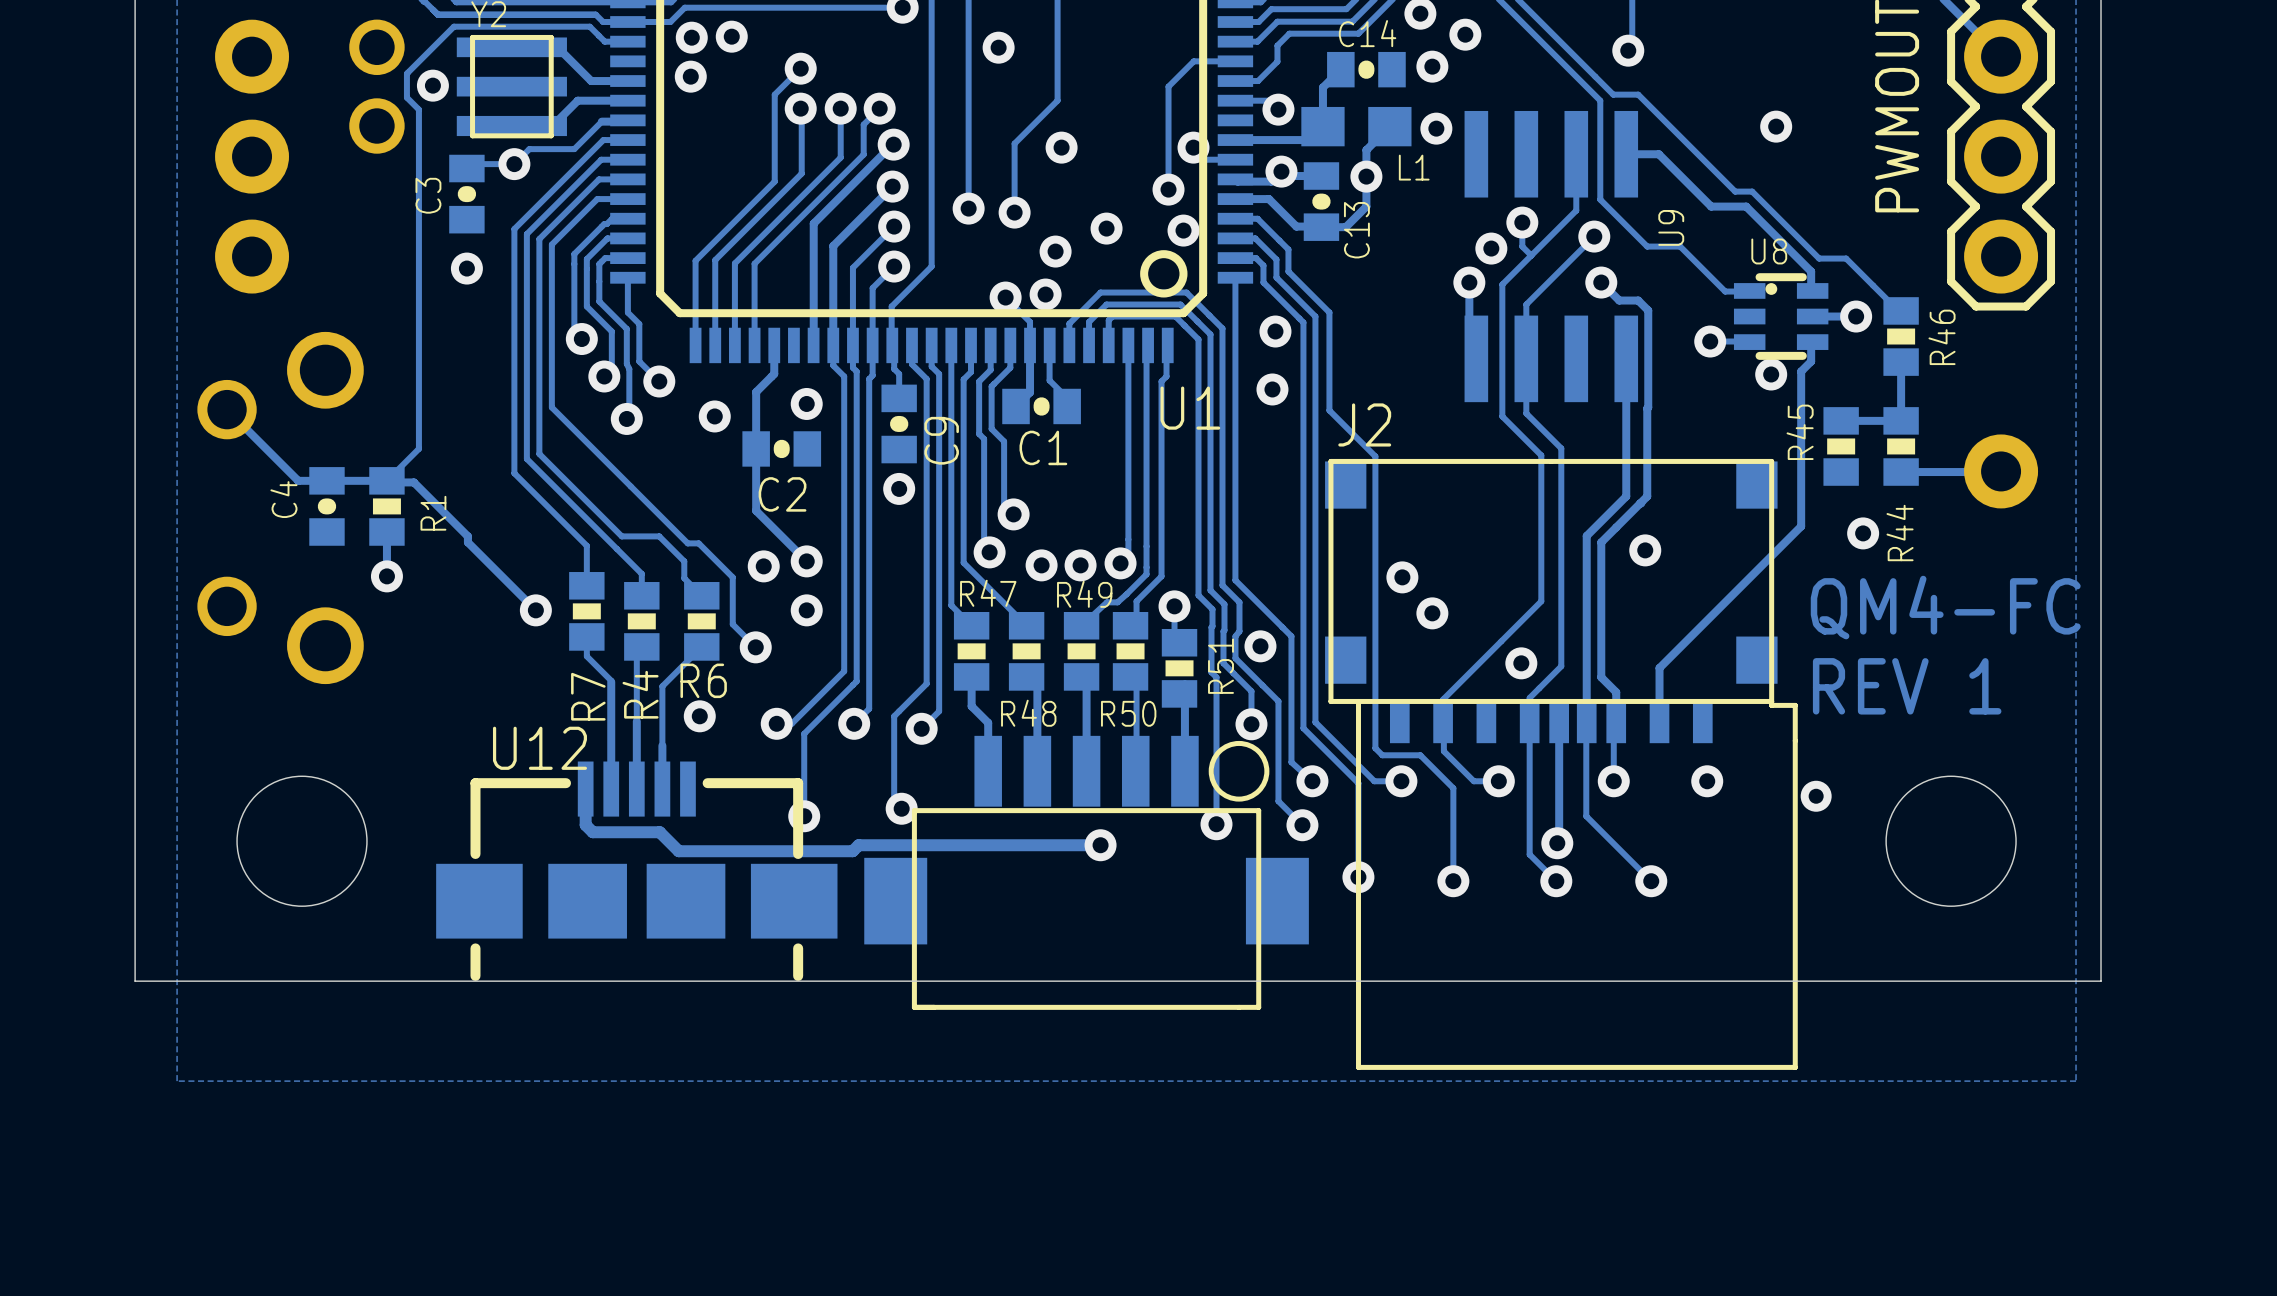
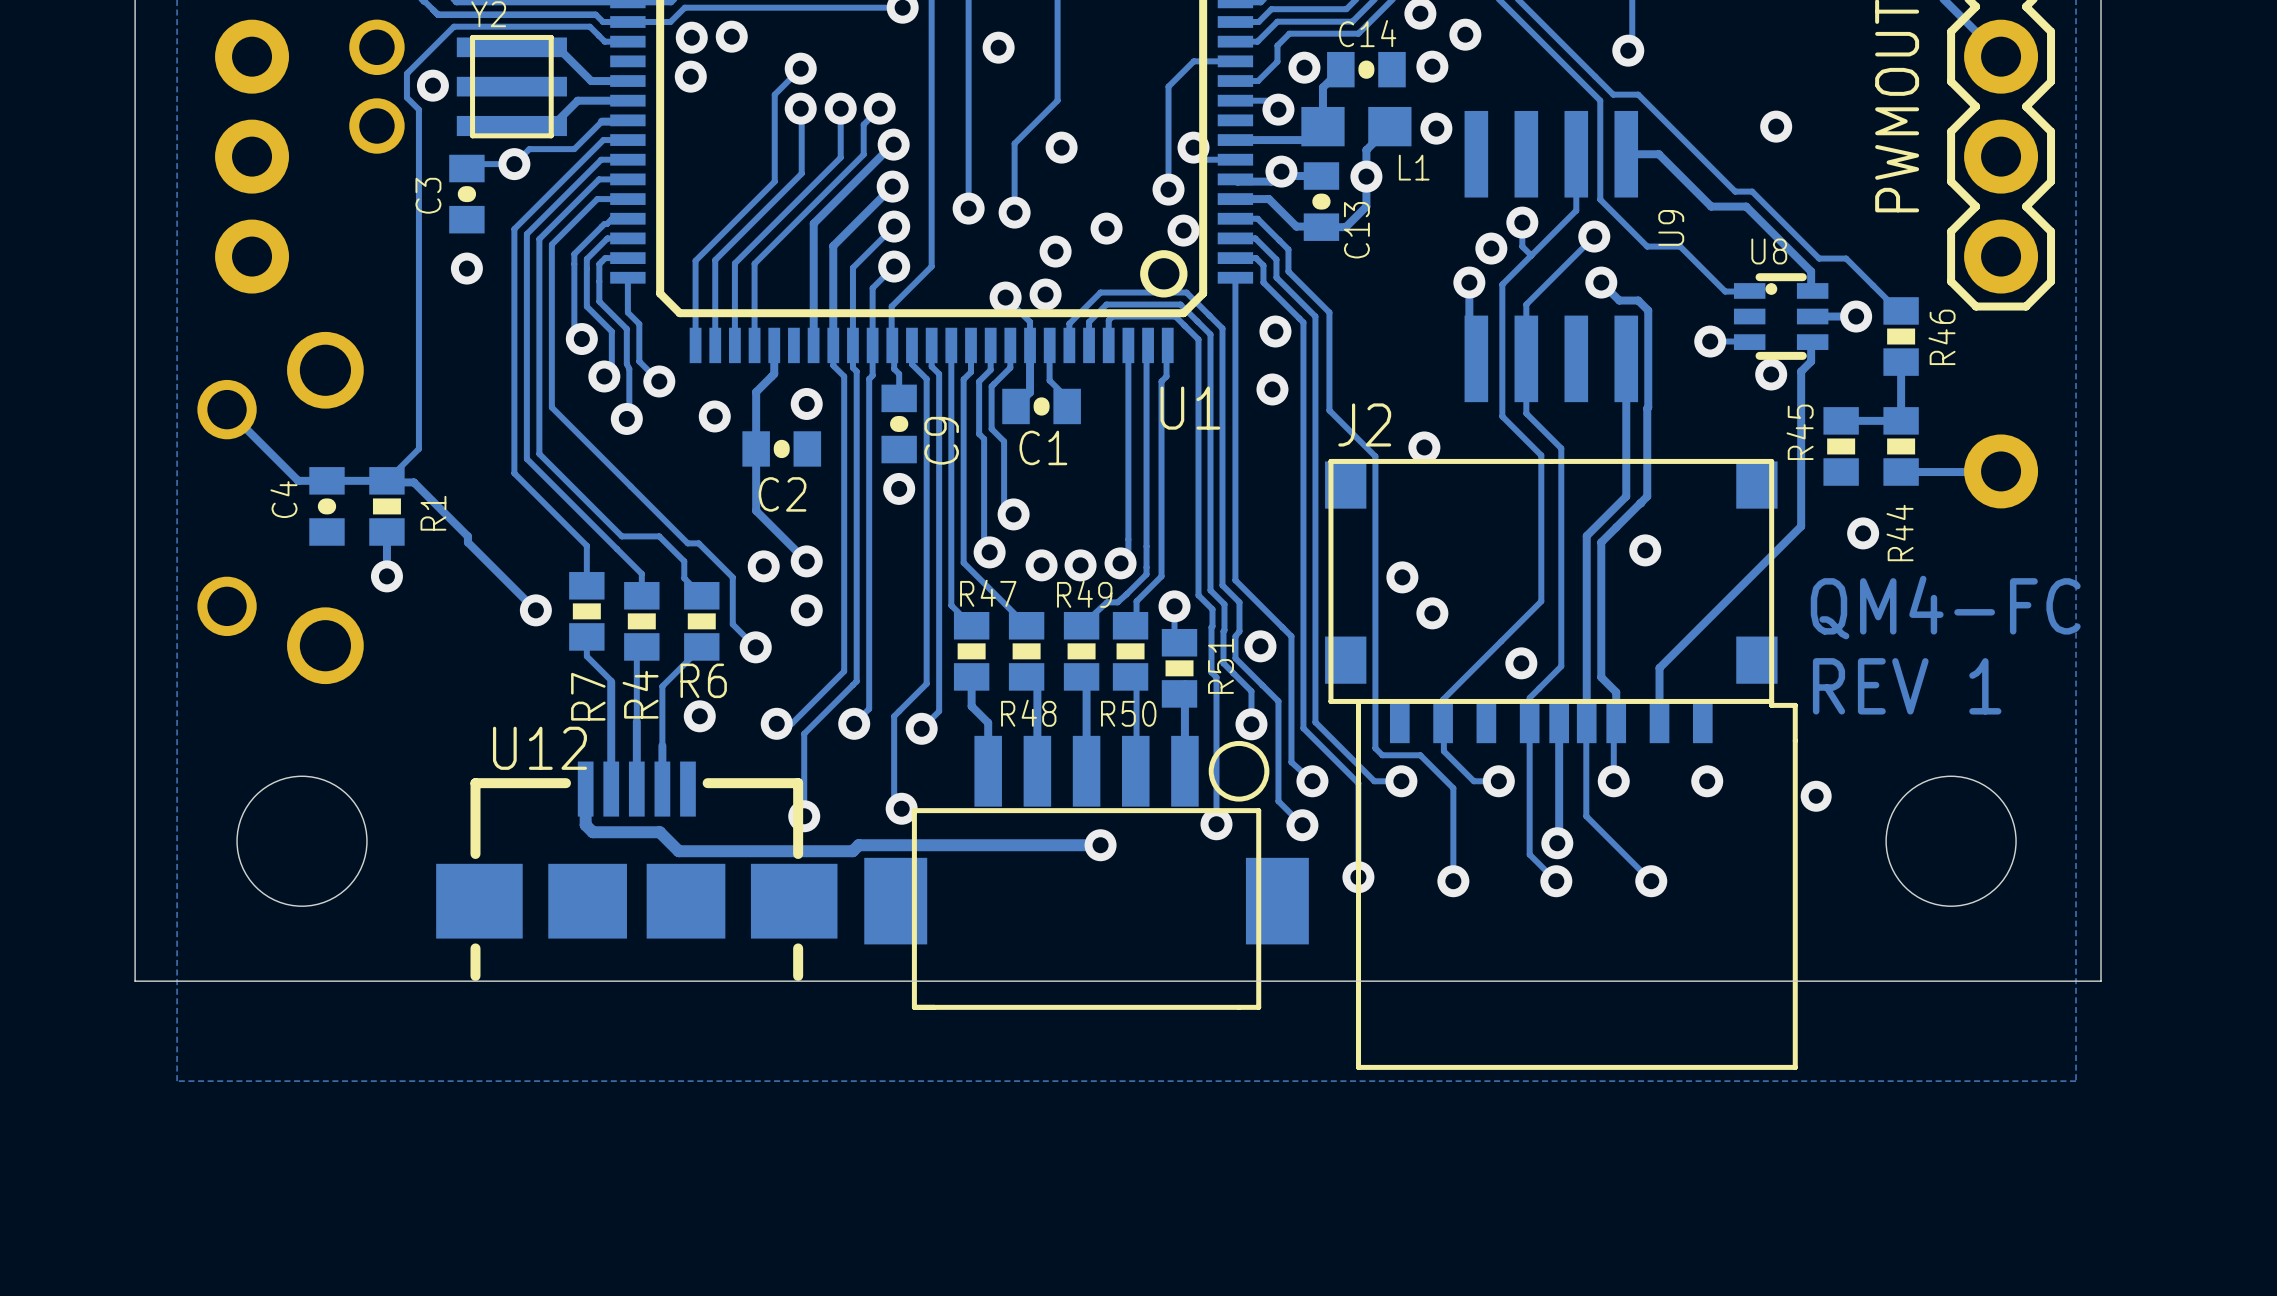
via: none -> (1304, 67)
via: none -> (1424, 447)

